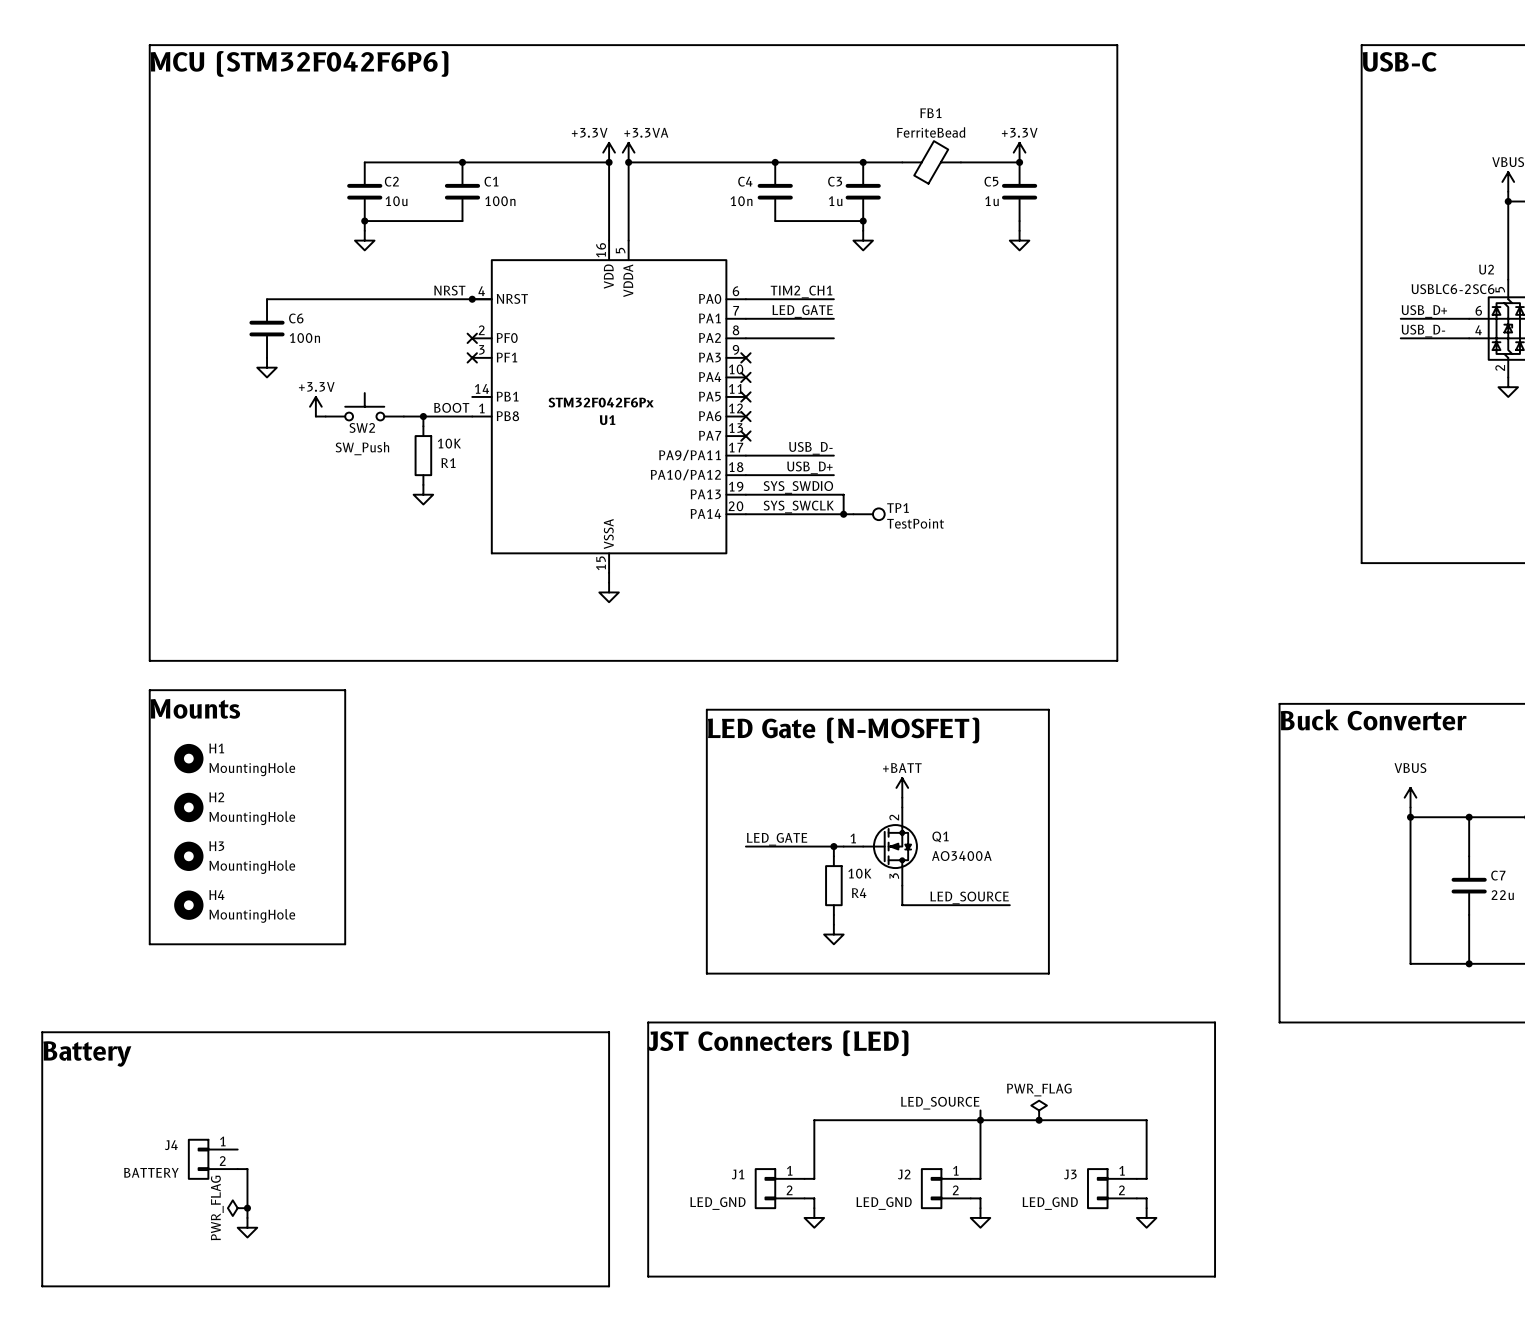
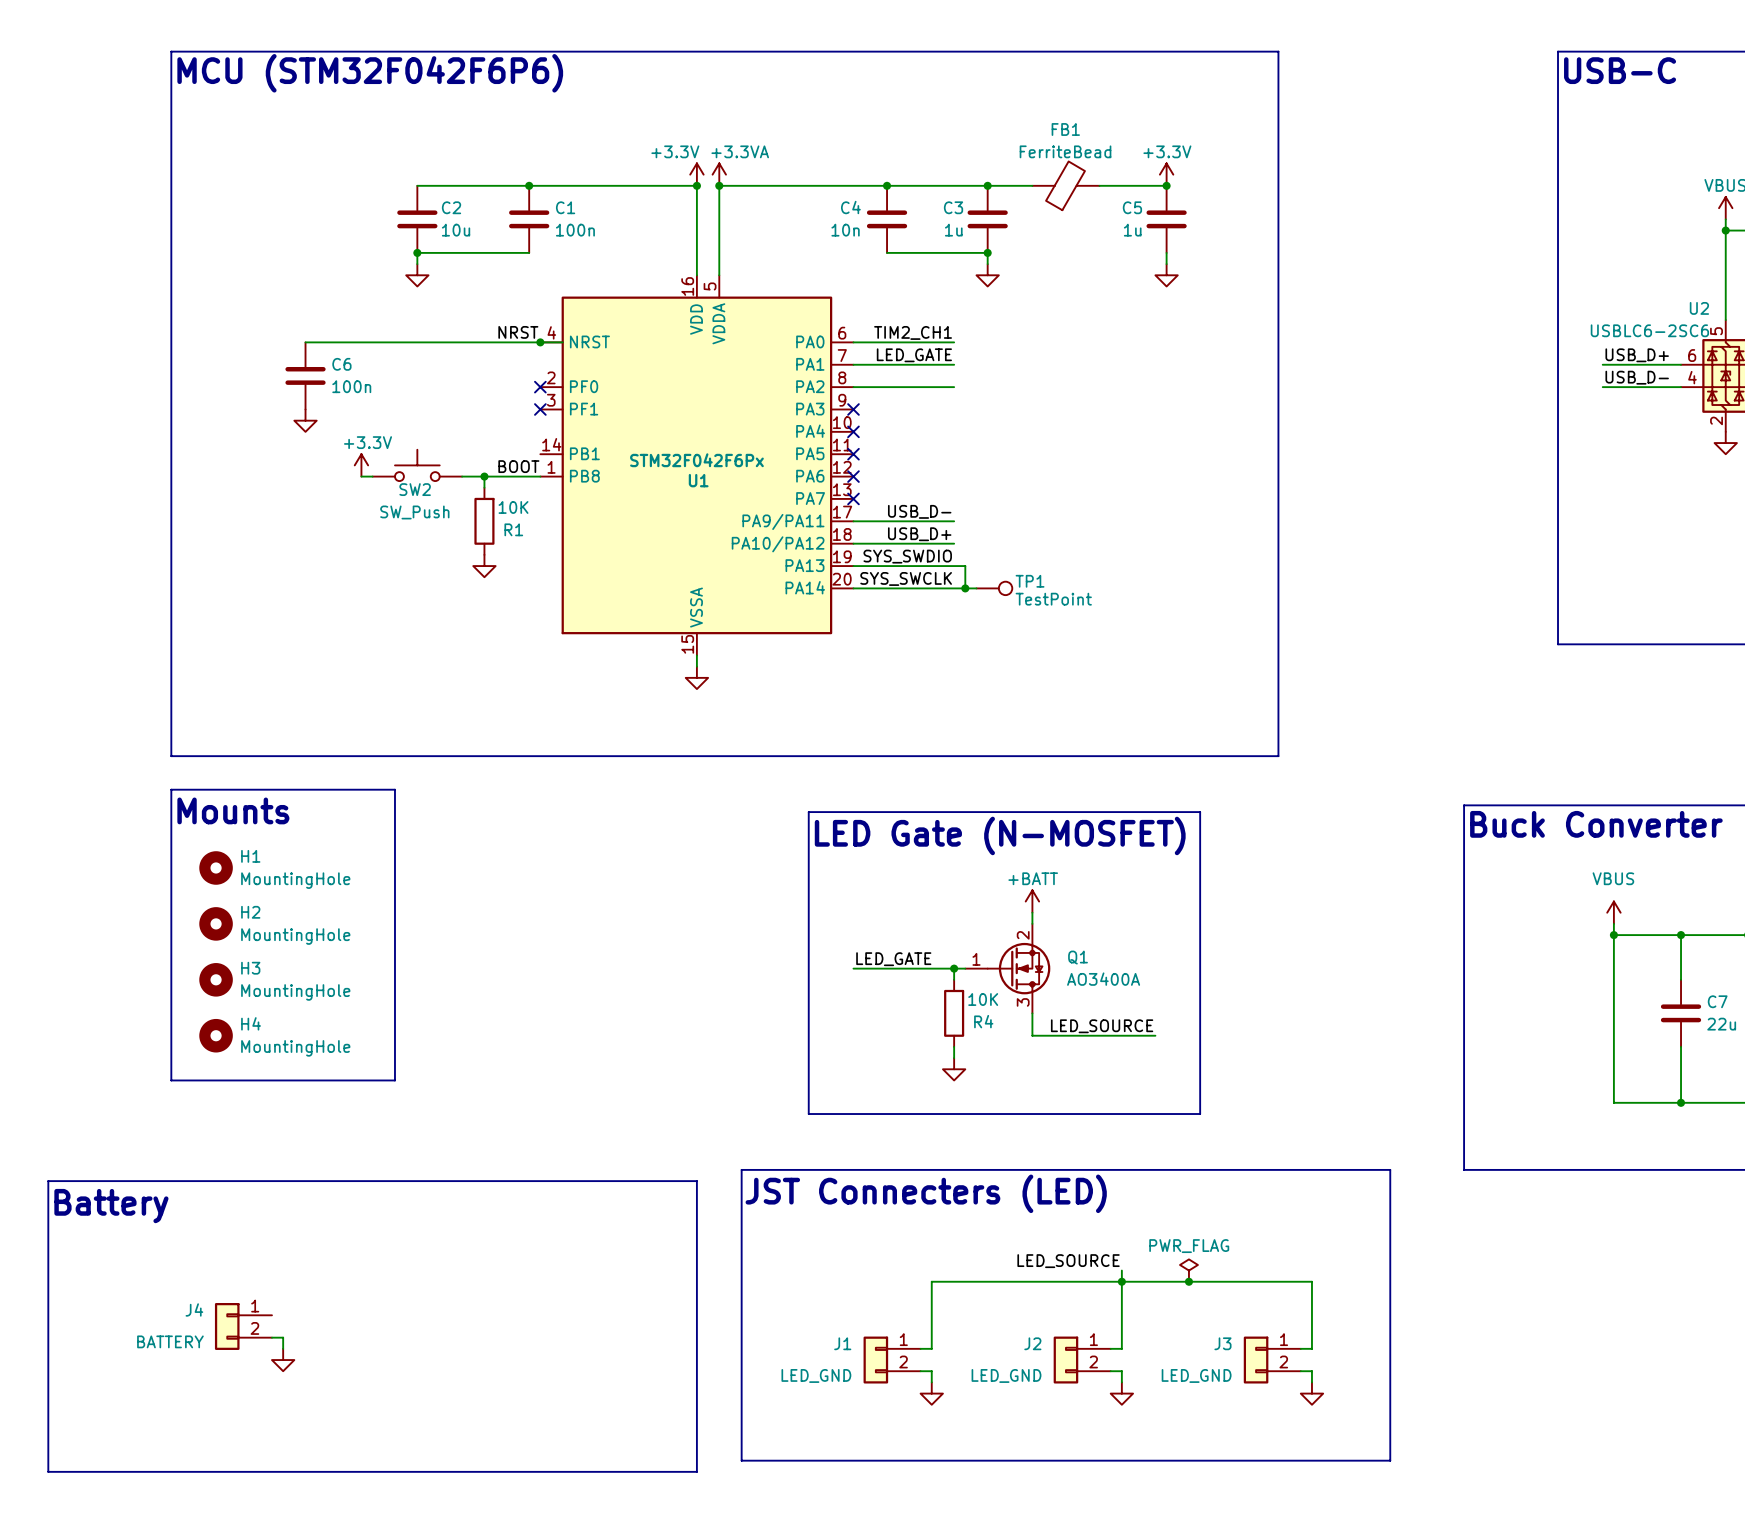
wire: (247, 1178) (247, 1217) -> none
power symbol: PWR_FLAG (237, 1208) -> none
junction: (247, 1208) -> none
power symbol position: (247, 1227) -> (283, 1360)

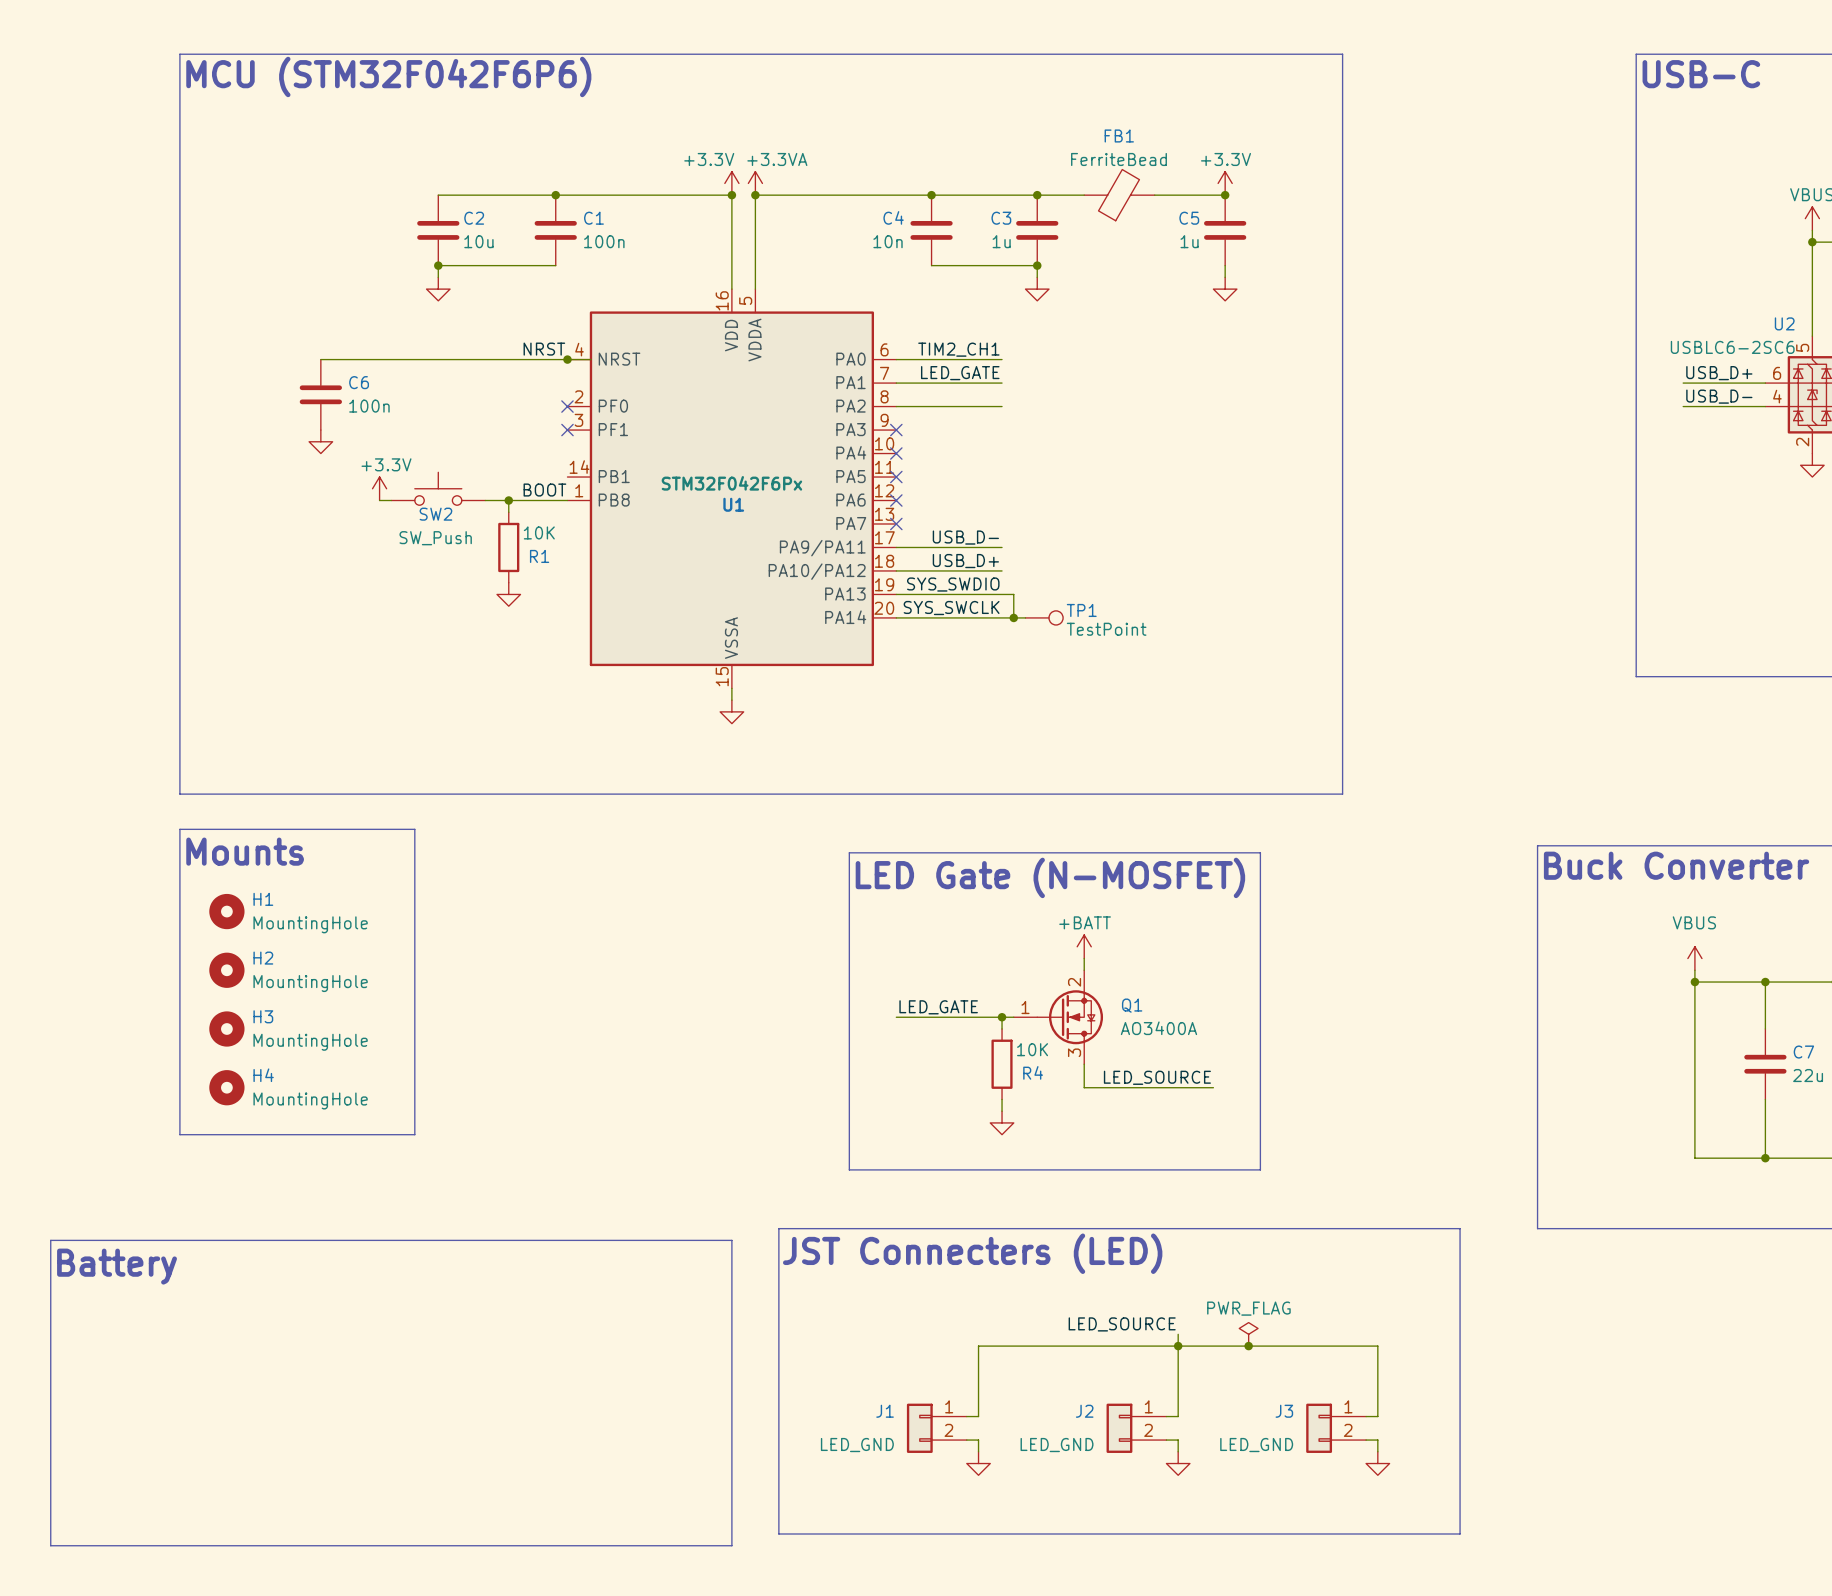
J4: BATTERY (243, 1326) -> none
wire: (271, 1337) (283, 1337) (283, 1348) -> none
power symbol: (283, 1360) -> none

